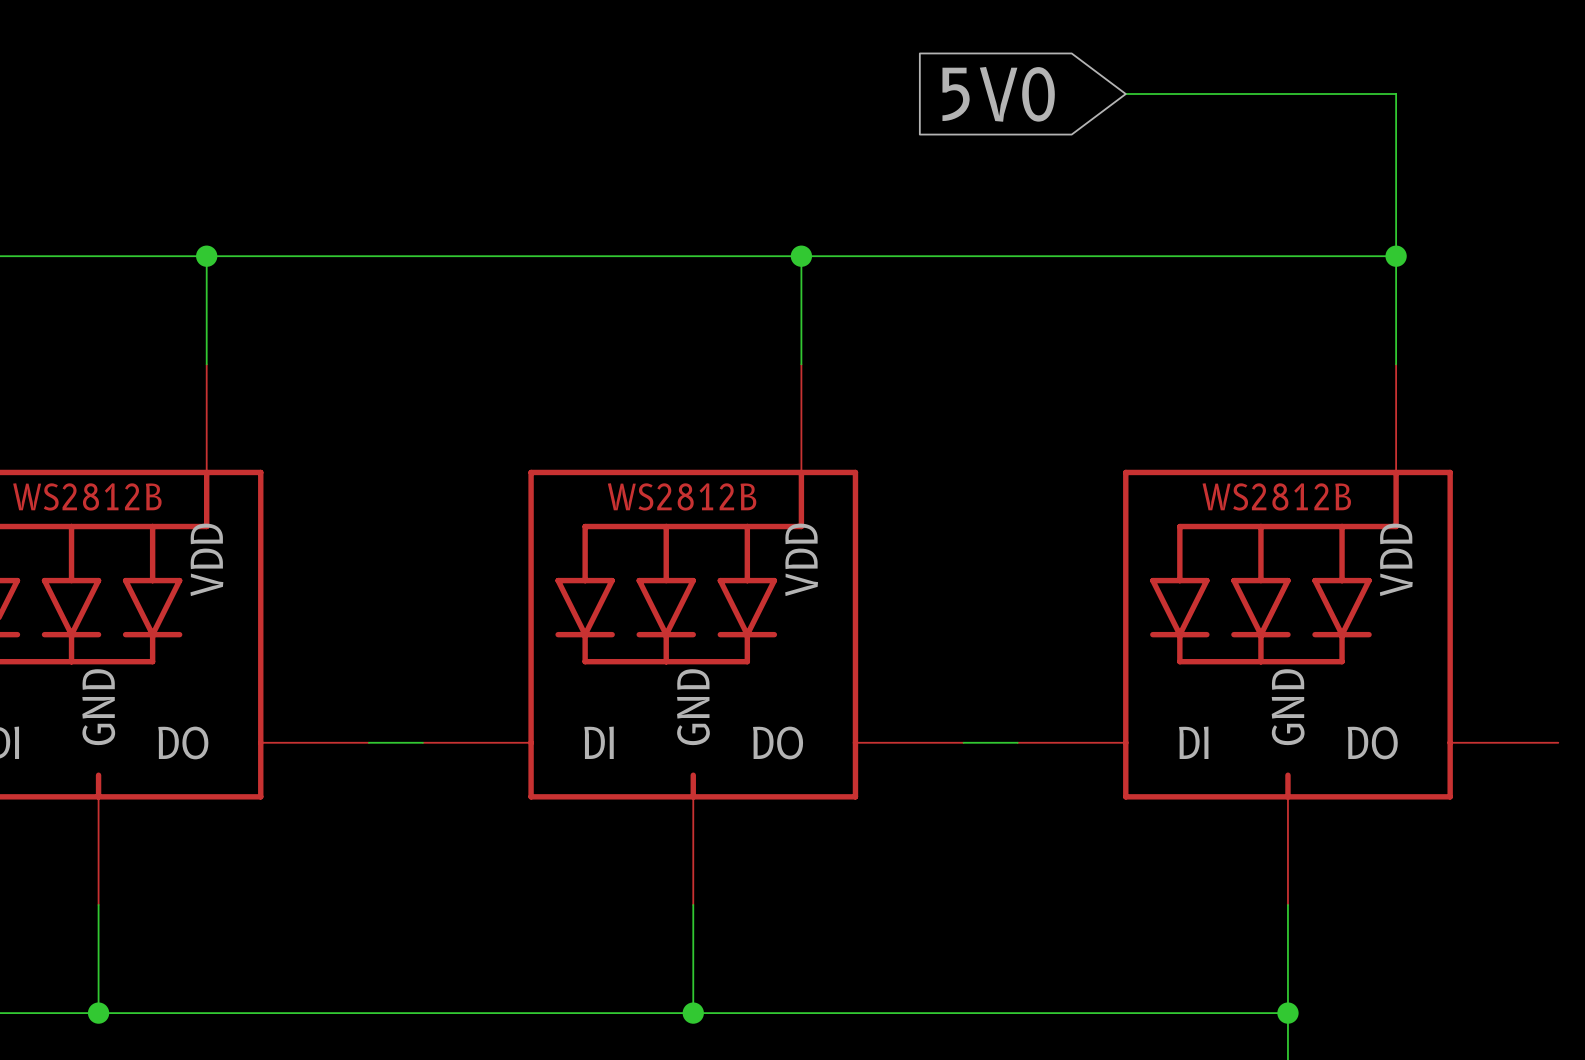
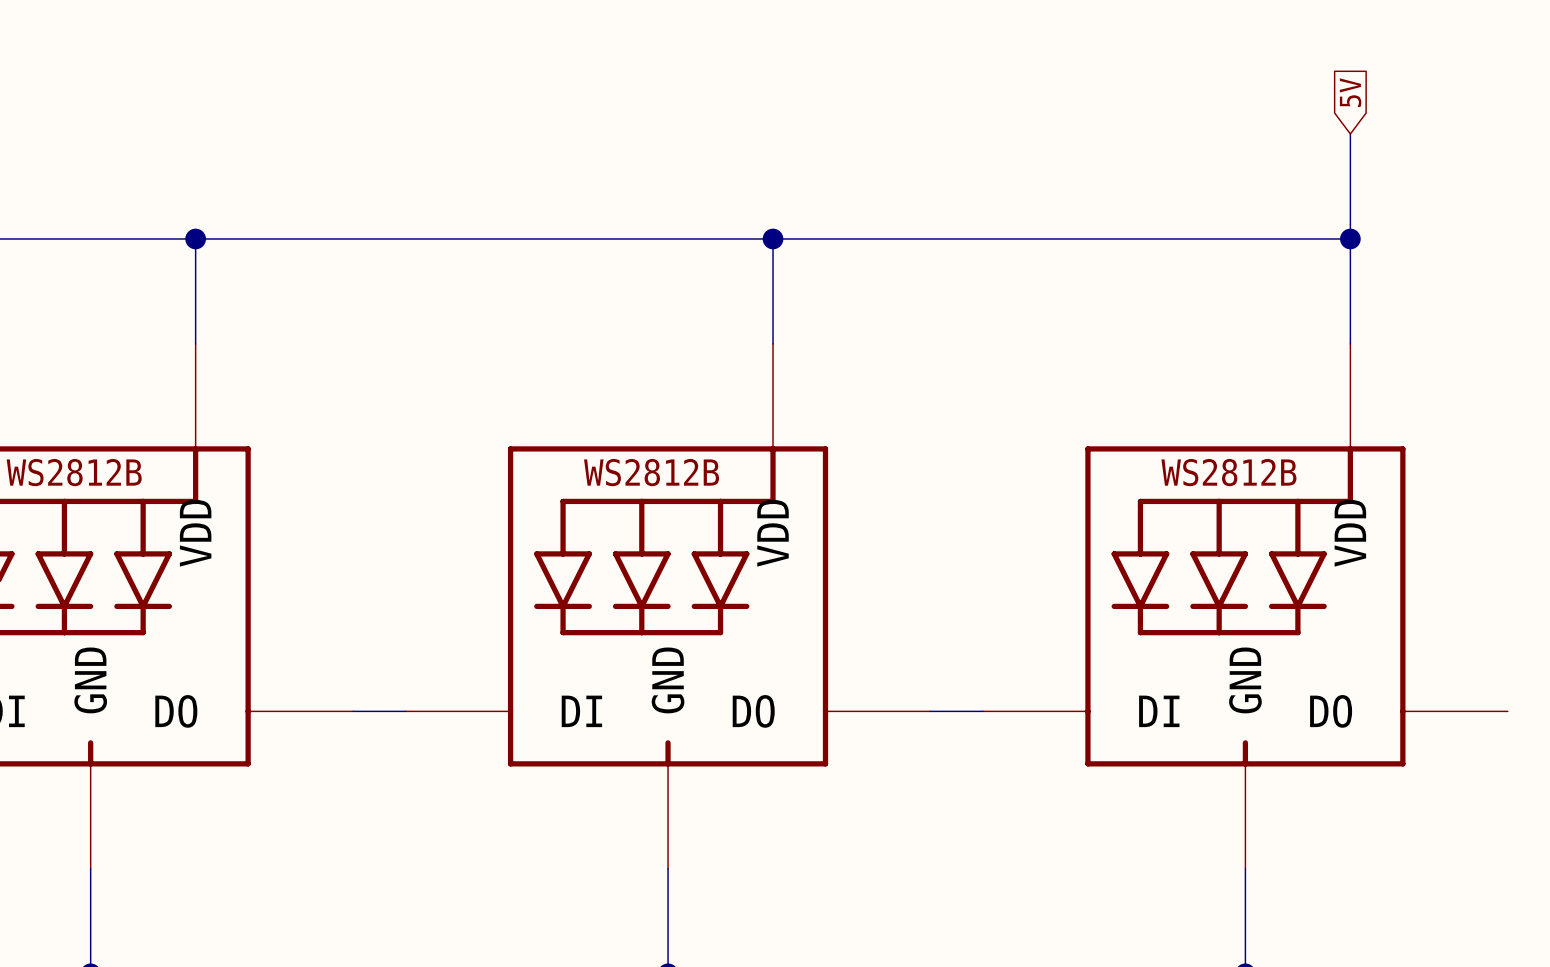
global label: 5V0 (998, 94) -> none
wire: (1125, 94) (1396, 94) (1396, 148) -> none
global label: none -> 5V (1350, 92)

